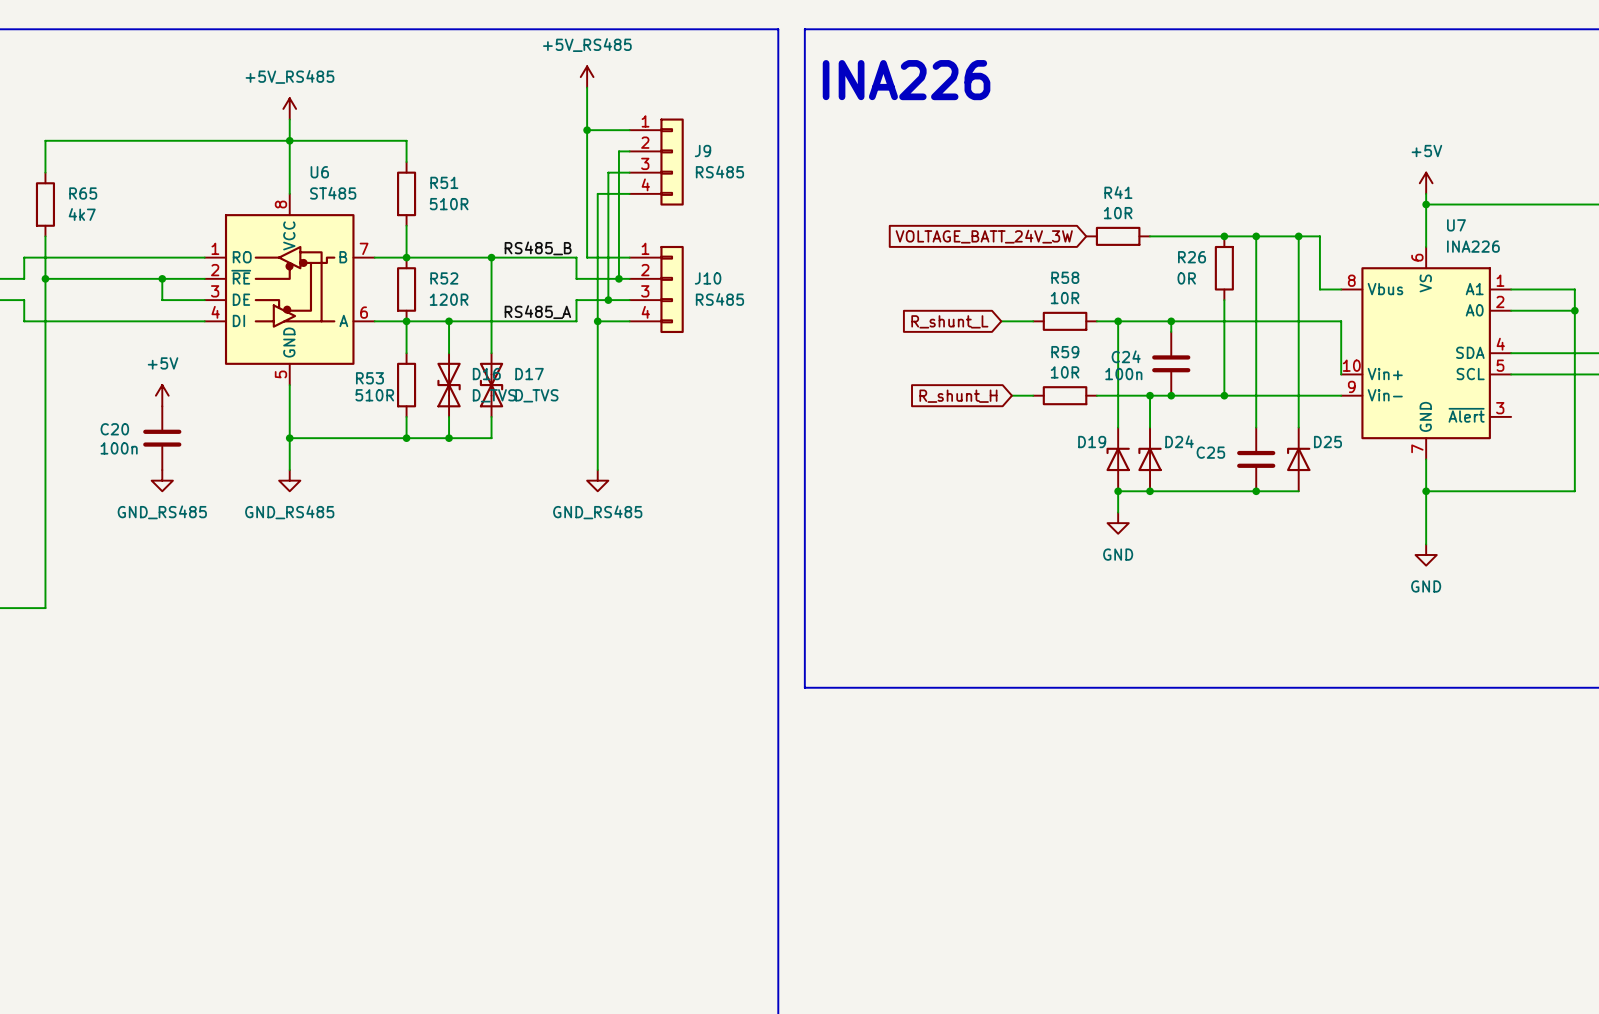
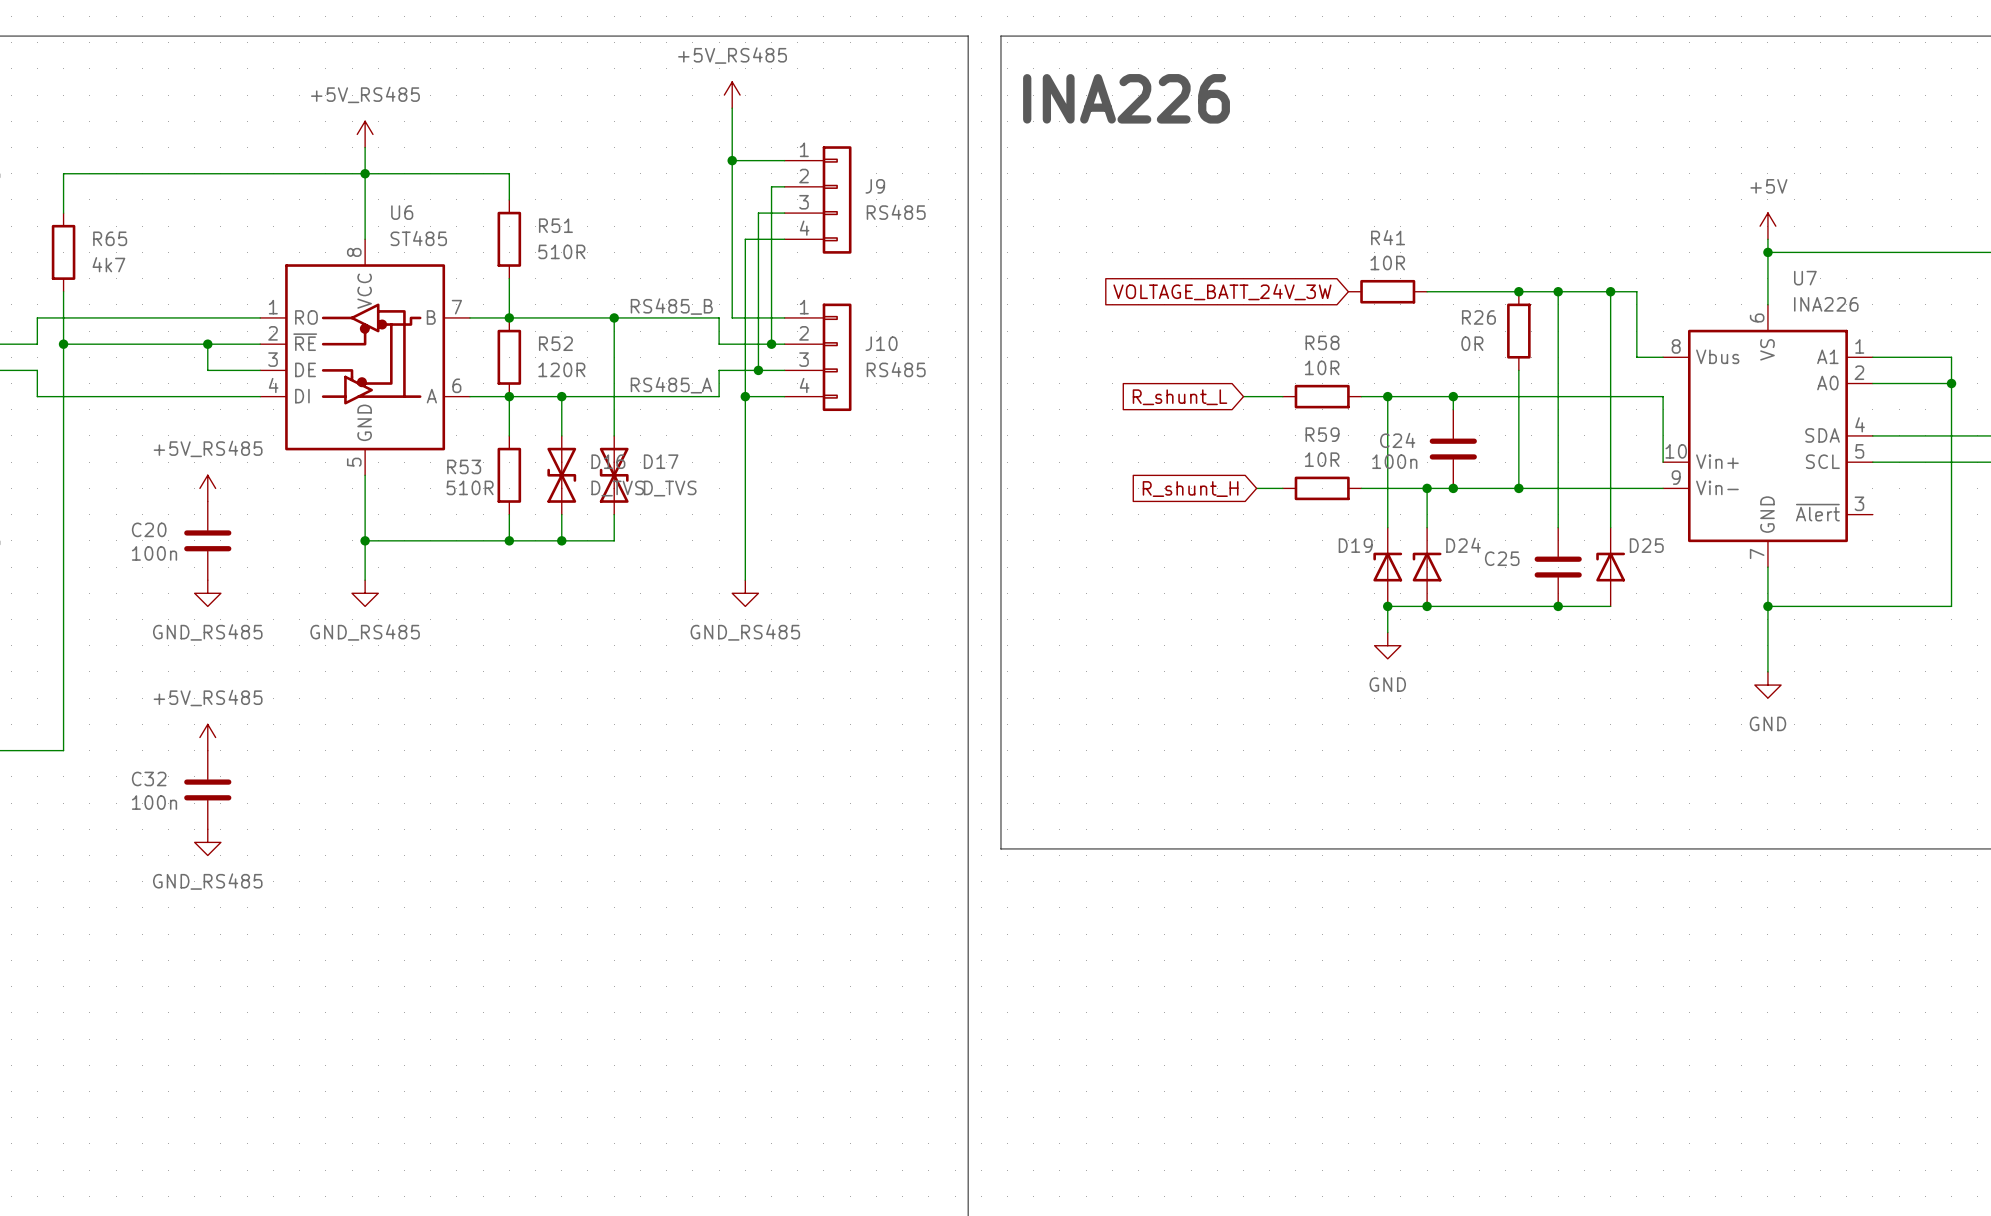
power symbol: +5V (162, 395) -> +5V_RS485 (207, 488)
power symbol: none -> +5V_RS485 (207, 737)
C32: none -> 100n (207, 789)
power symbol: none -> GND_RS485 (207, 842)

